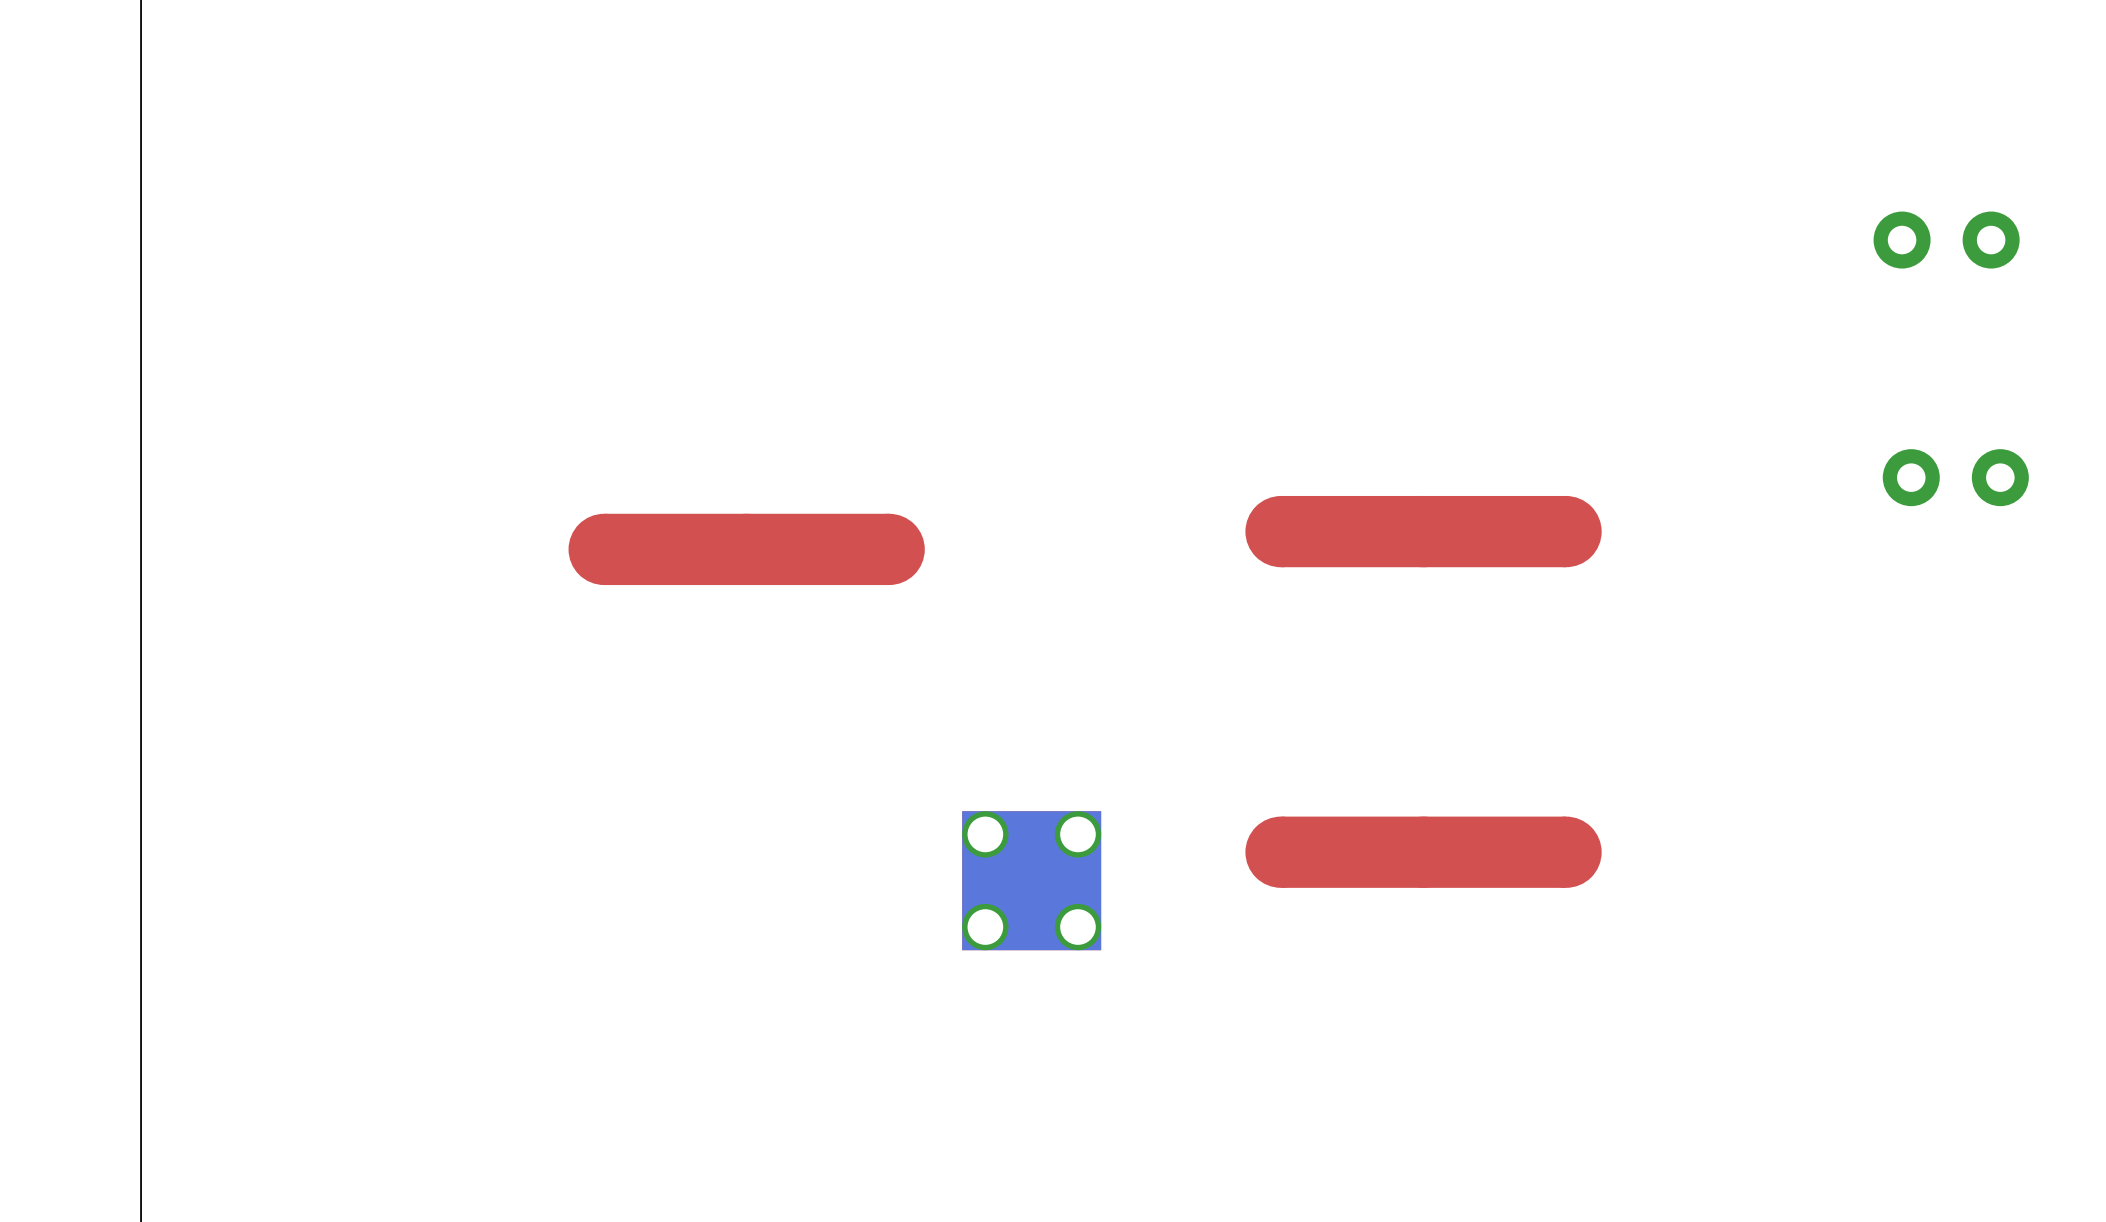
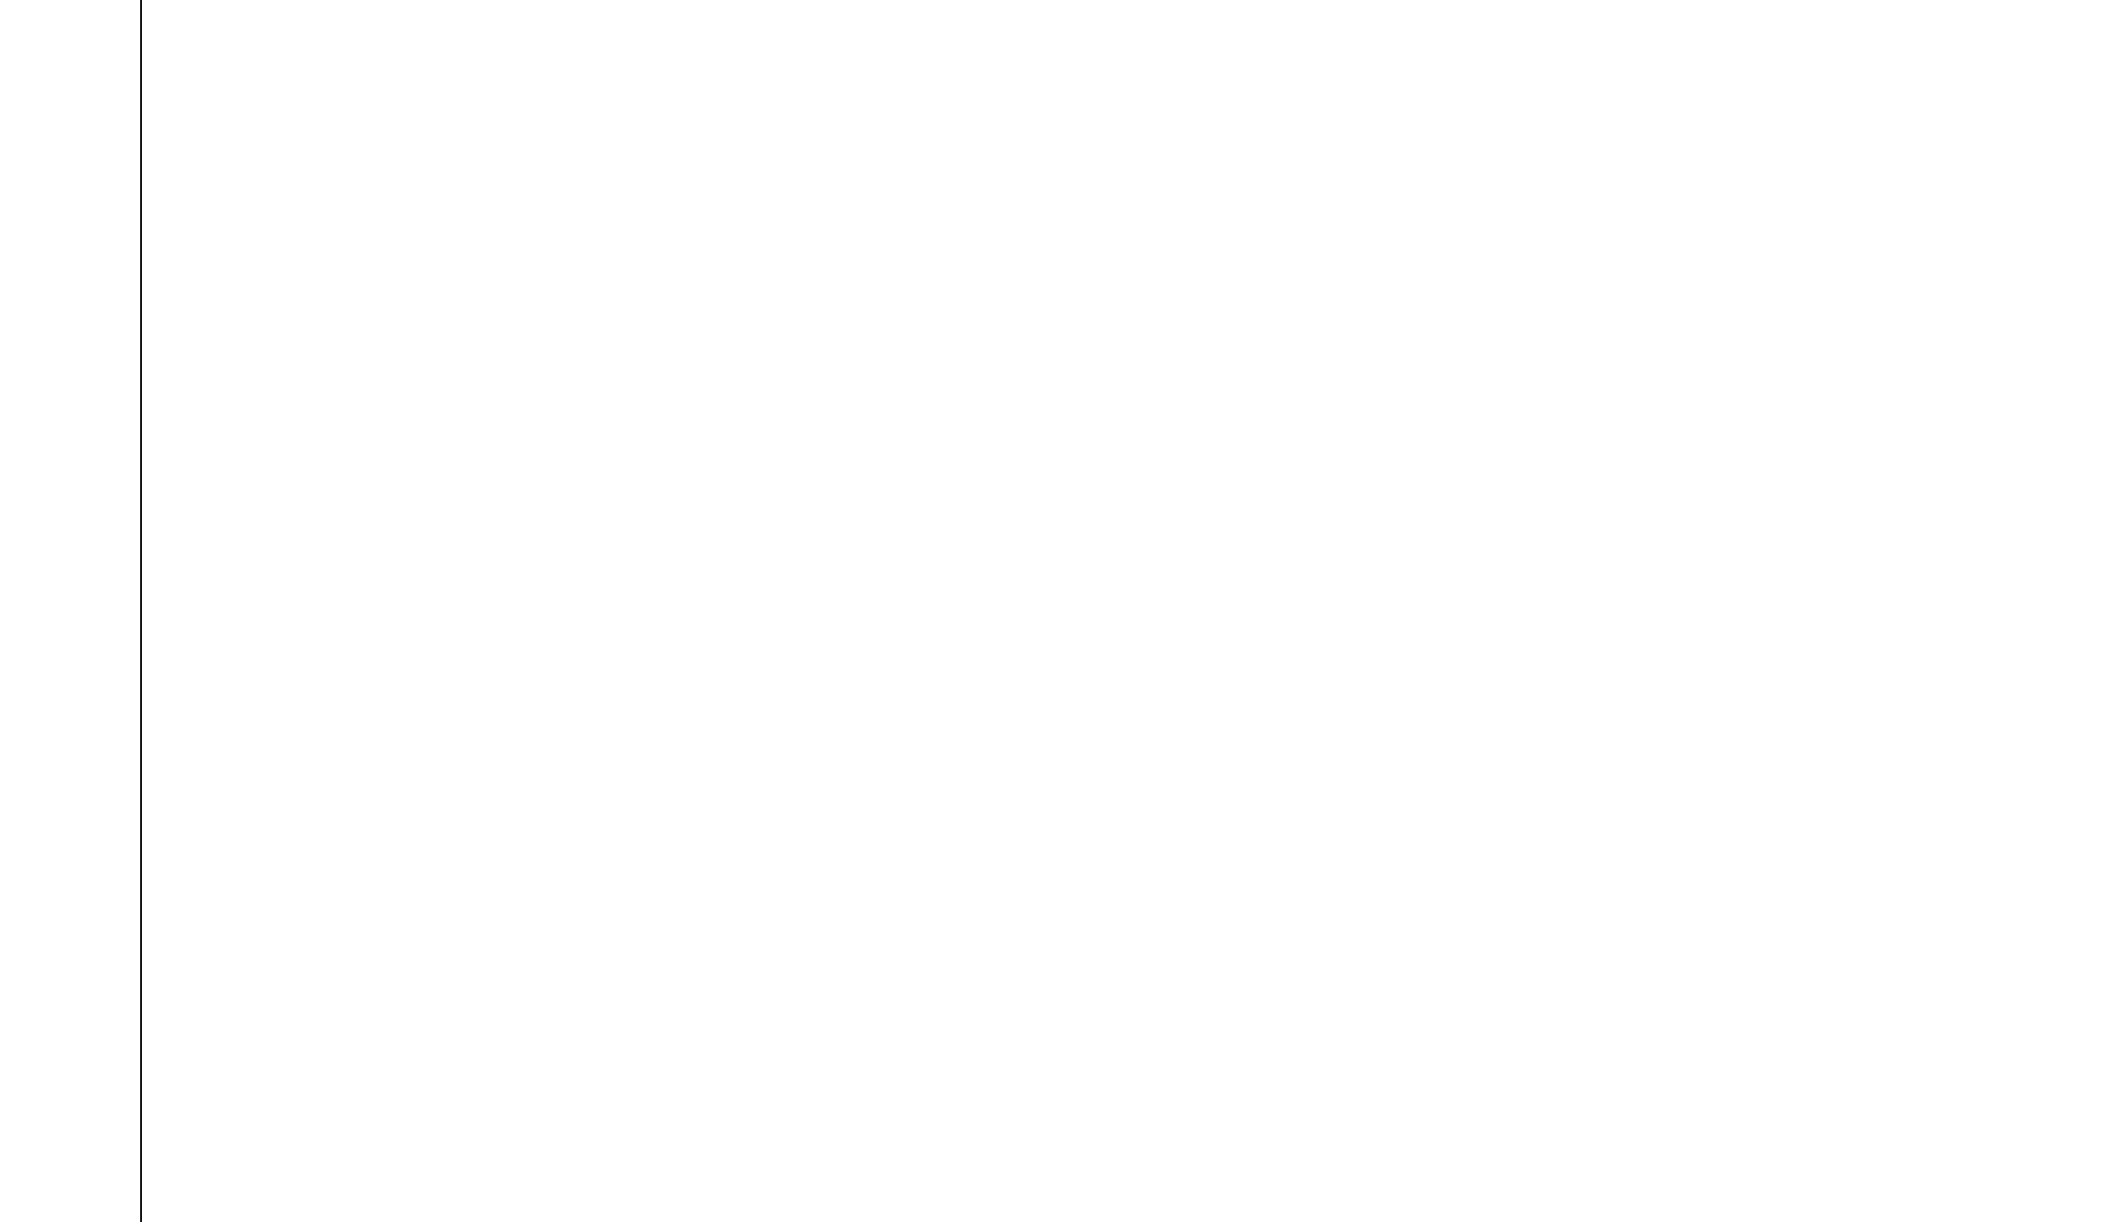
part: (1946, 240) -> none
part: (1955, 477) -> none
part: (1423, 531) -> none
part: (746, 549) -> none
part: (1423, 852) -> none
part: (1031, 880) -> none

